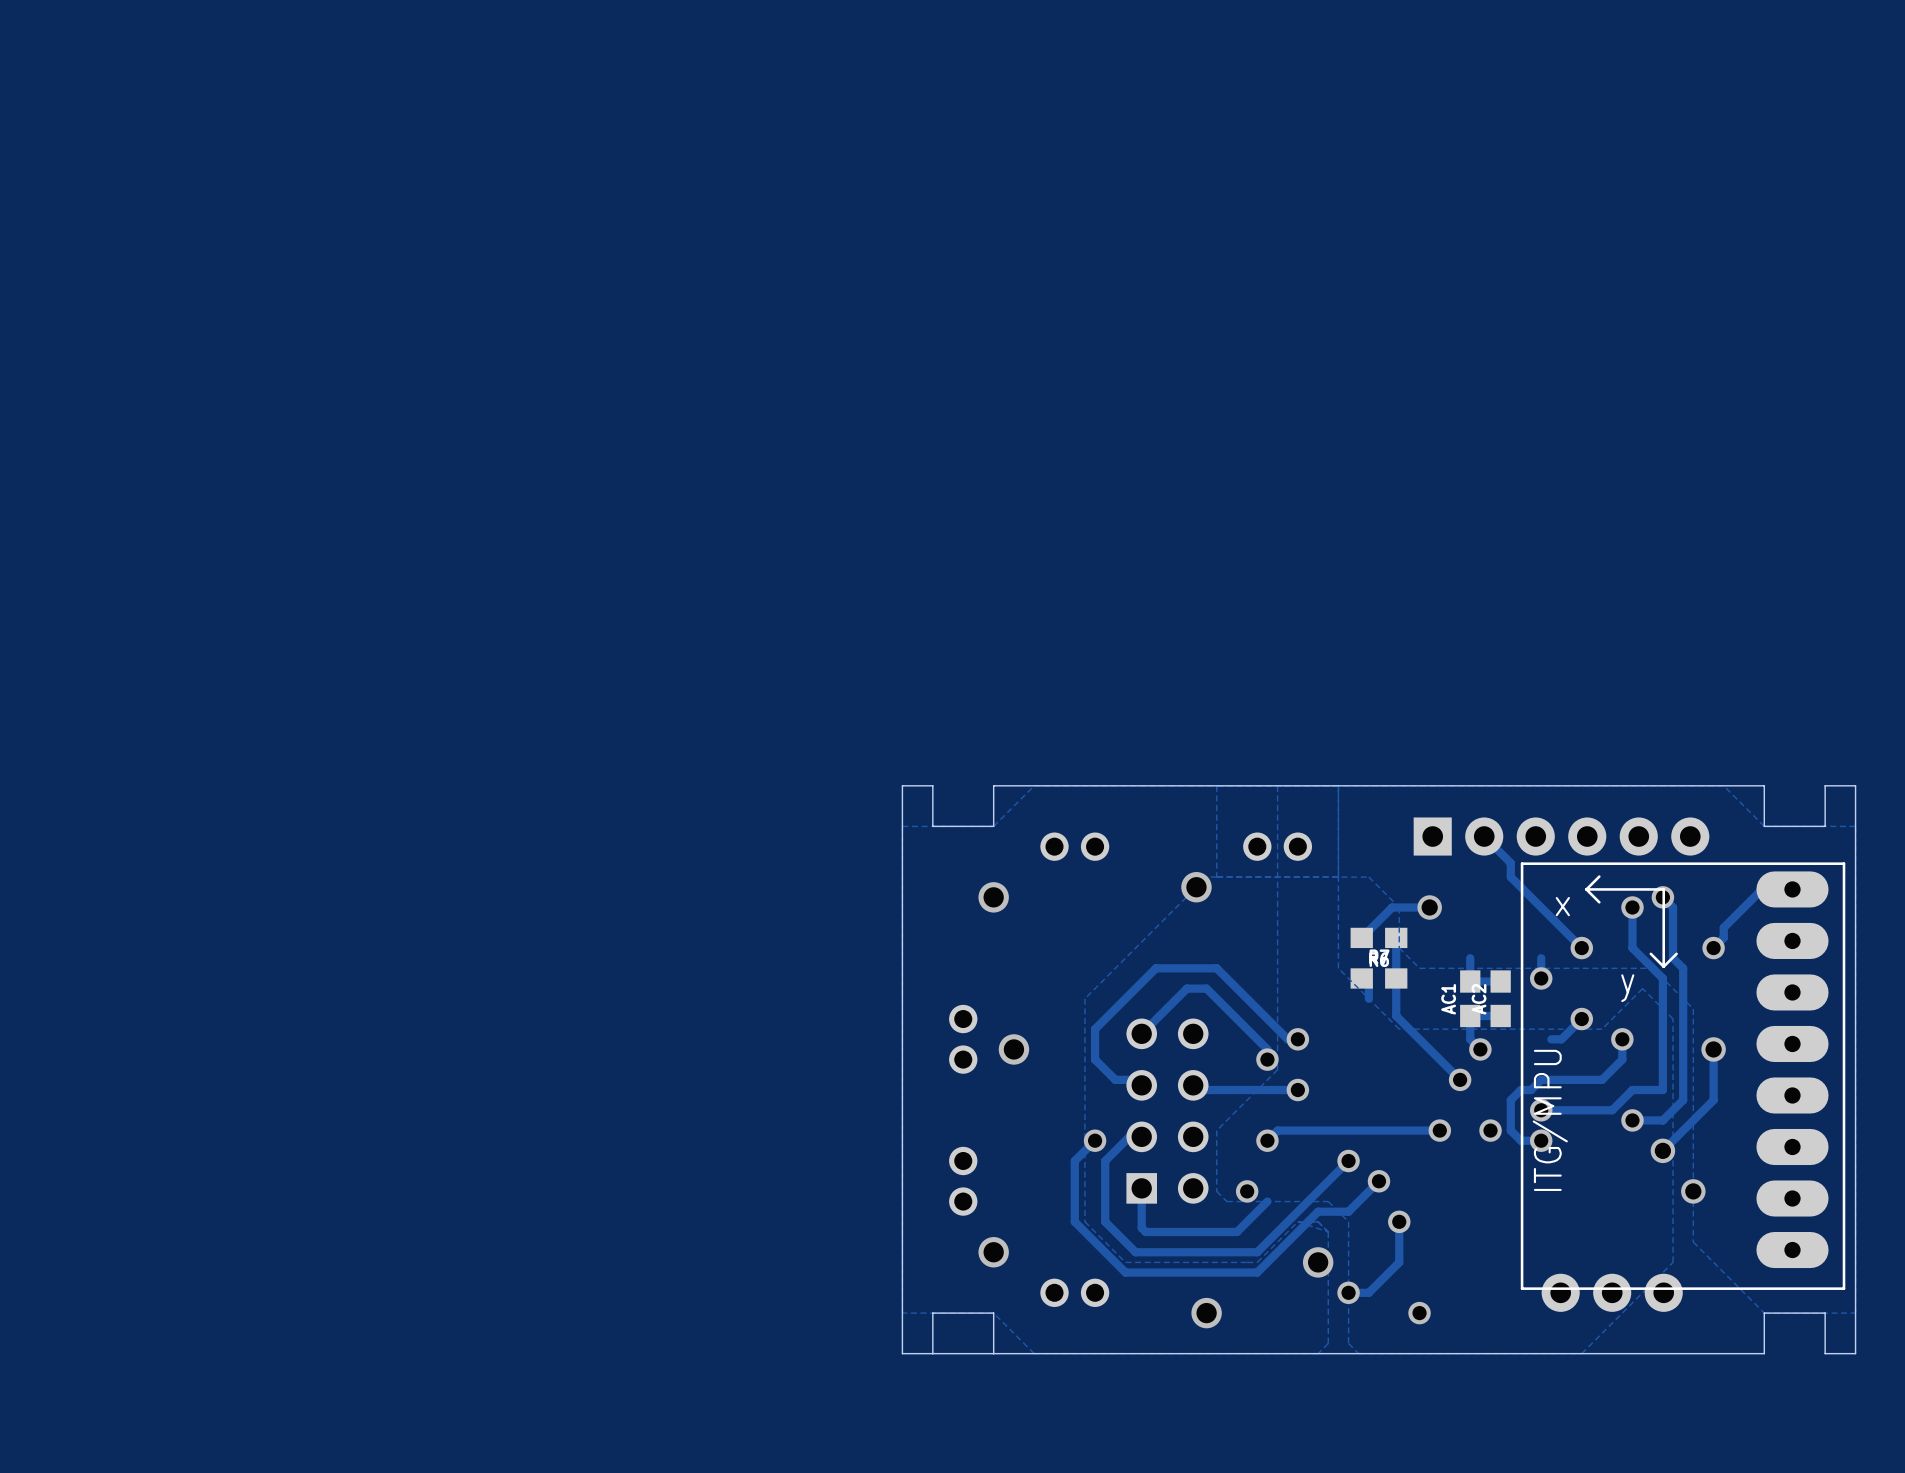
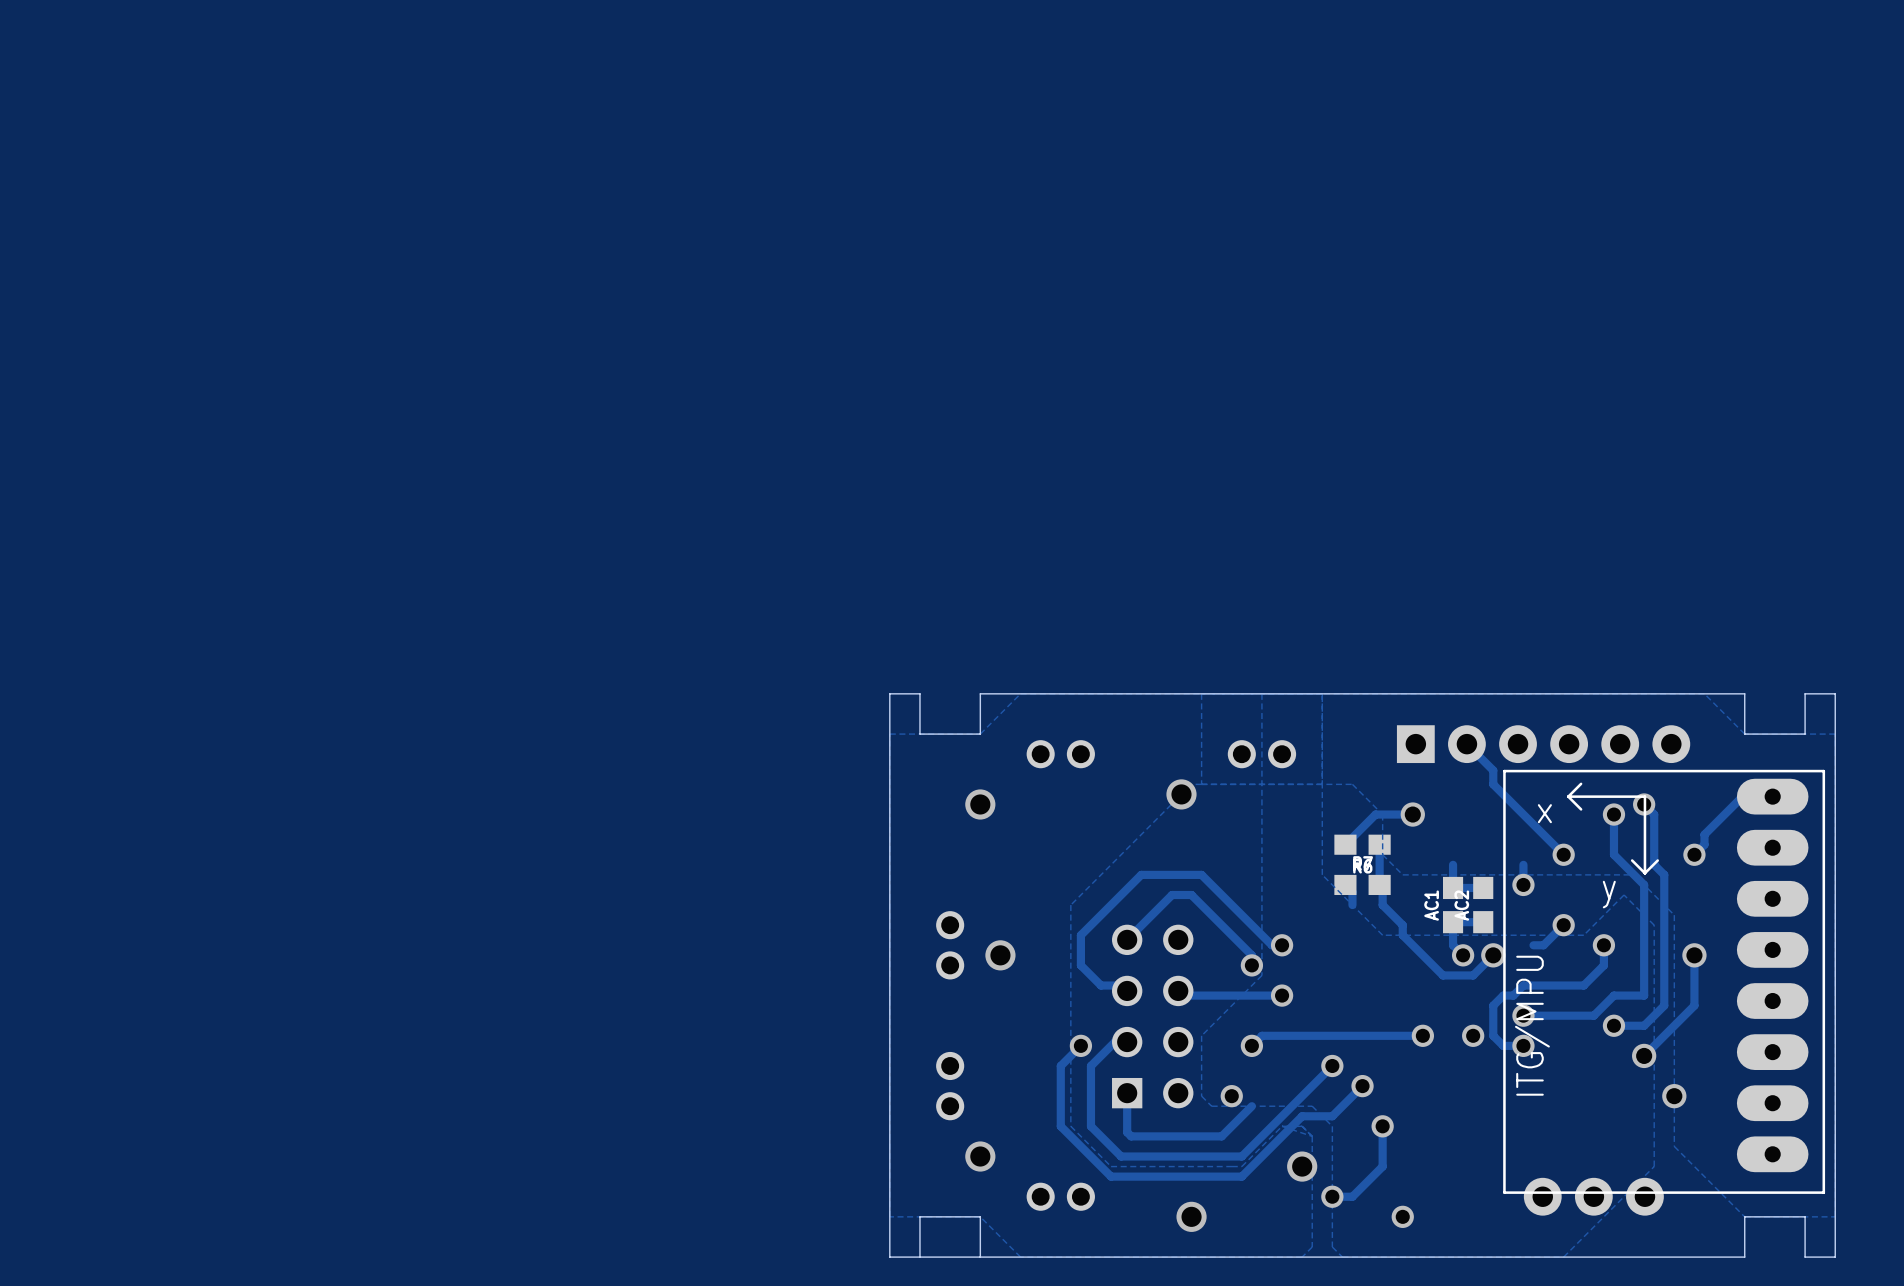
track: (1396, 978) (1396, 1015) (1460, 1079) -> (1379, 884) (1382, 887) (1382, 905) (1402, 925) (1402, 935) (1442, 975) (1473, 975) (1493, 955)
via: none -> (1493, 955)
via: (1460, 1079) -> none

